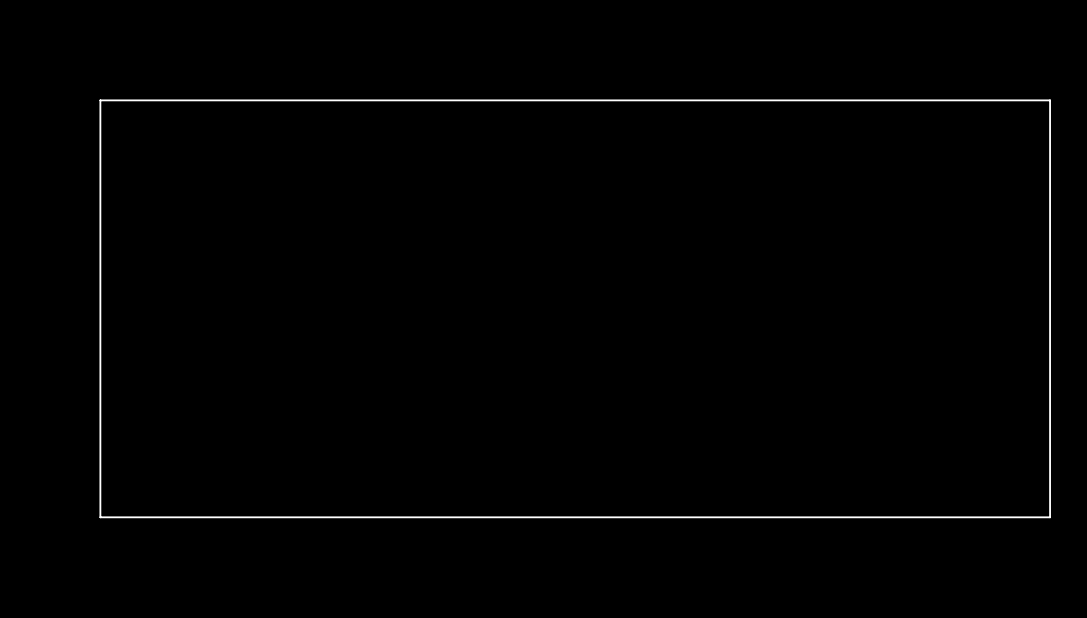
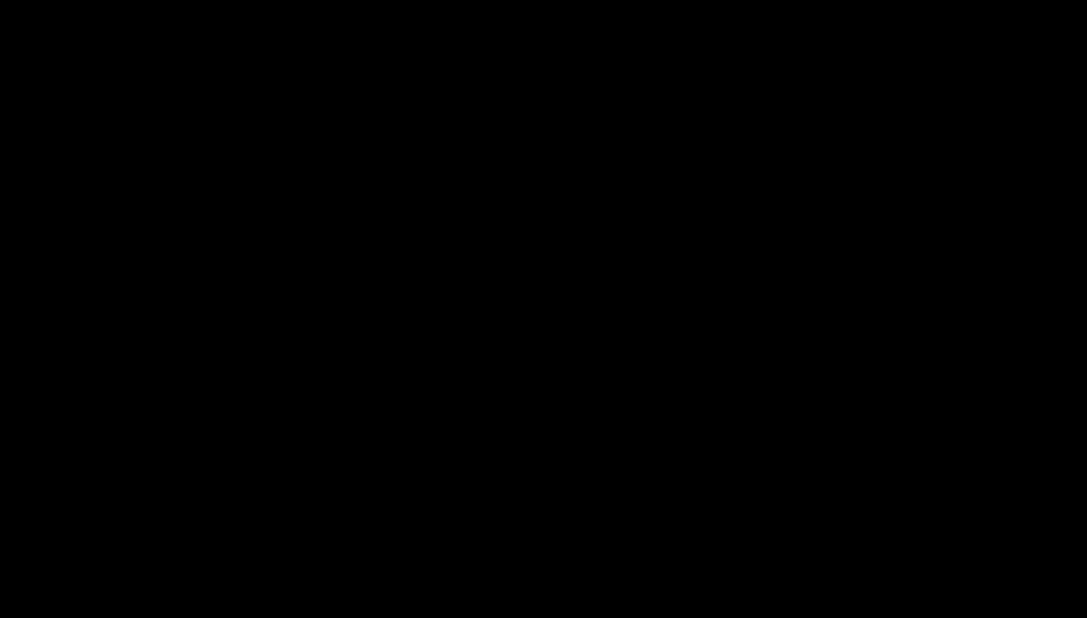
board edge: (1050, 100) (1050, 517) (100, 517) (100, 100) (1050, 100) -> none

